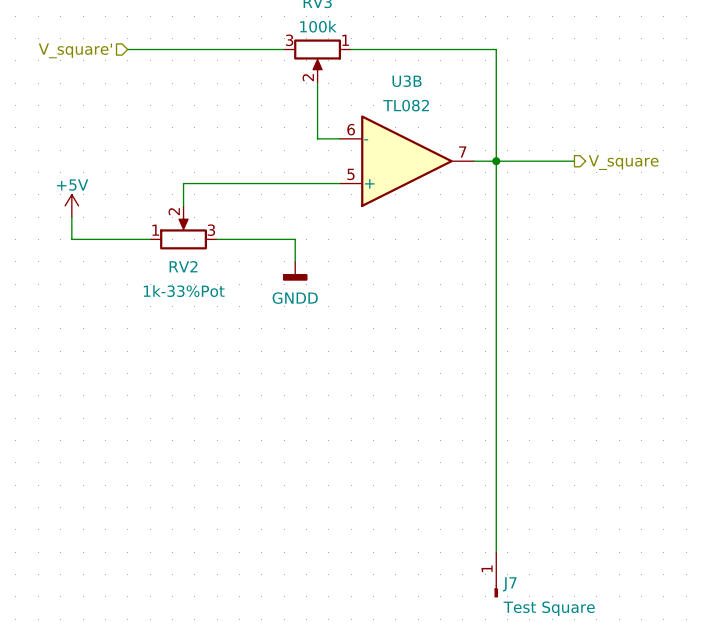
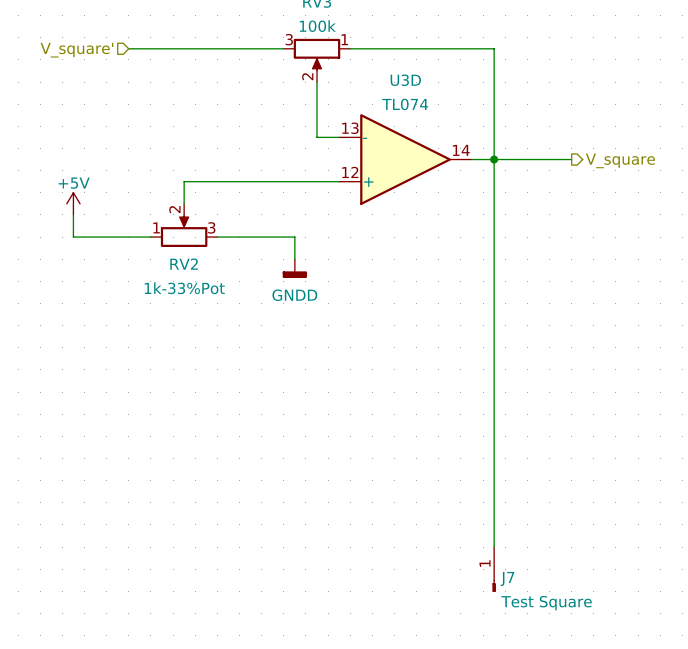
U3B name: U3B (407, 81) -> U3D (405, 80)
U3B value: TL082 (406, 105) -> TL074 (405, 104)
U3B pin number: 6 (351, 129) -> 13 (350, 128)
U3B pin number: 7 (462, 151) -> 14 (461, 150)
U3B pin number: 5 (351, 174) -> 12 (350, 172)

